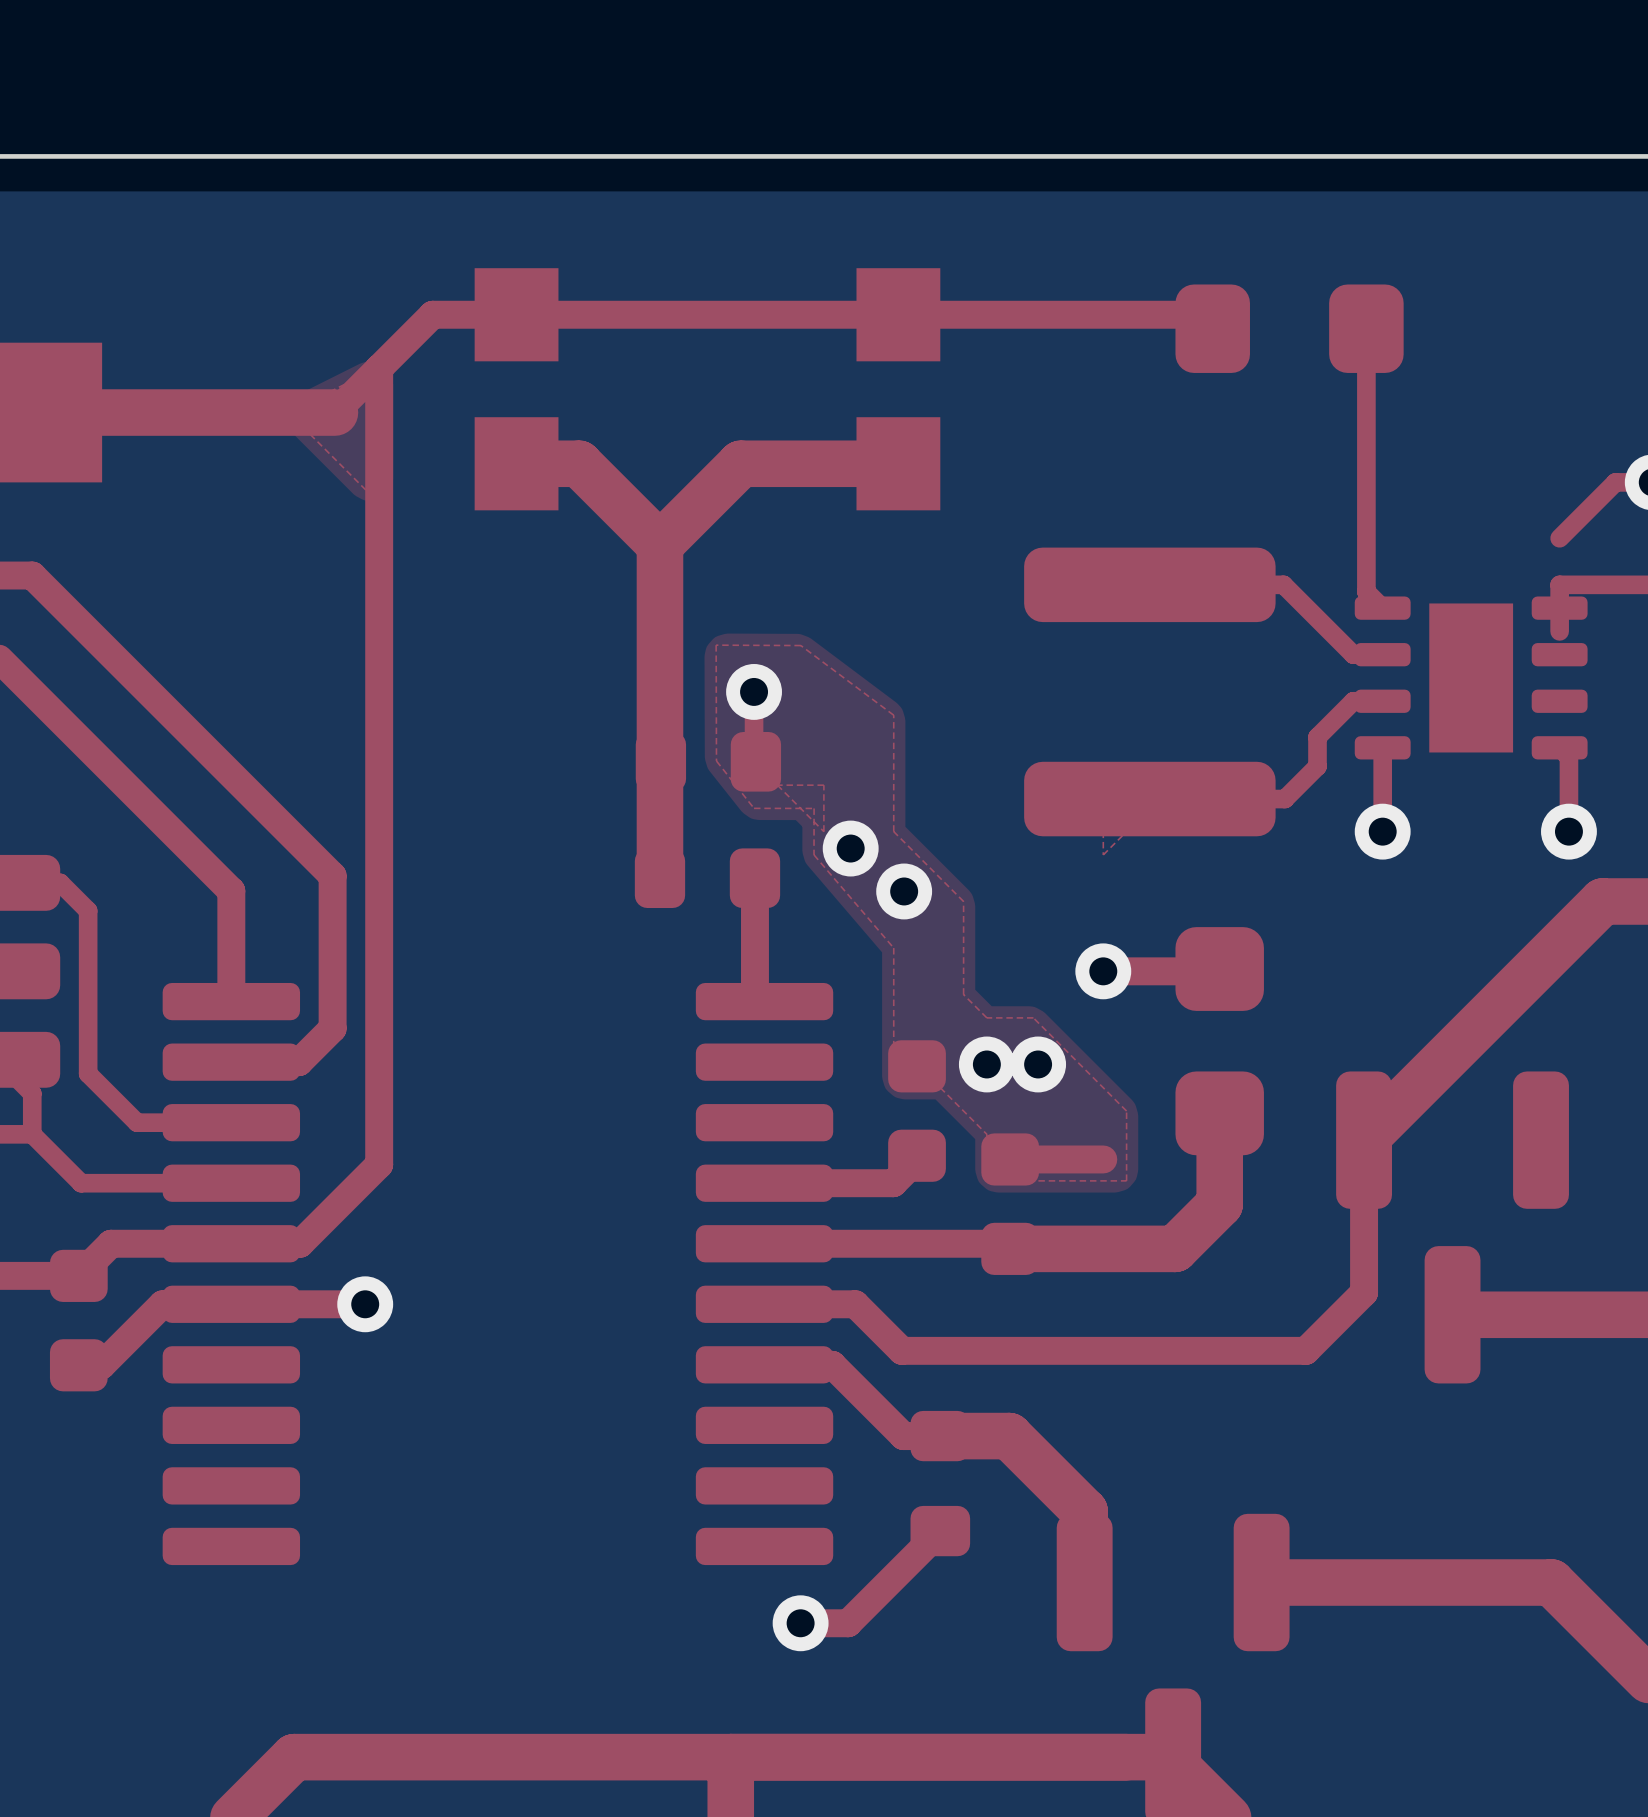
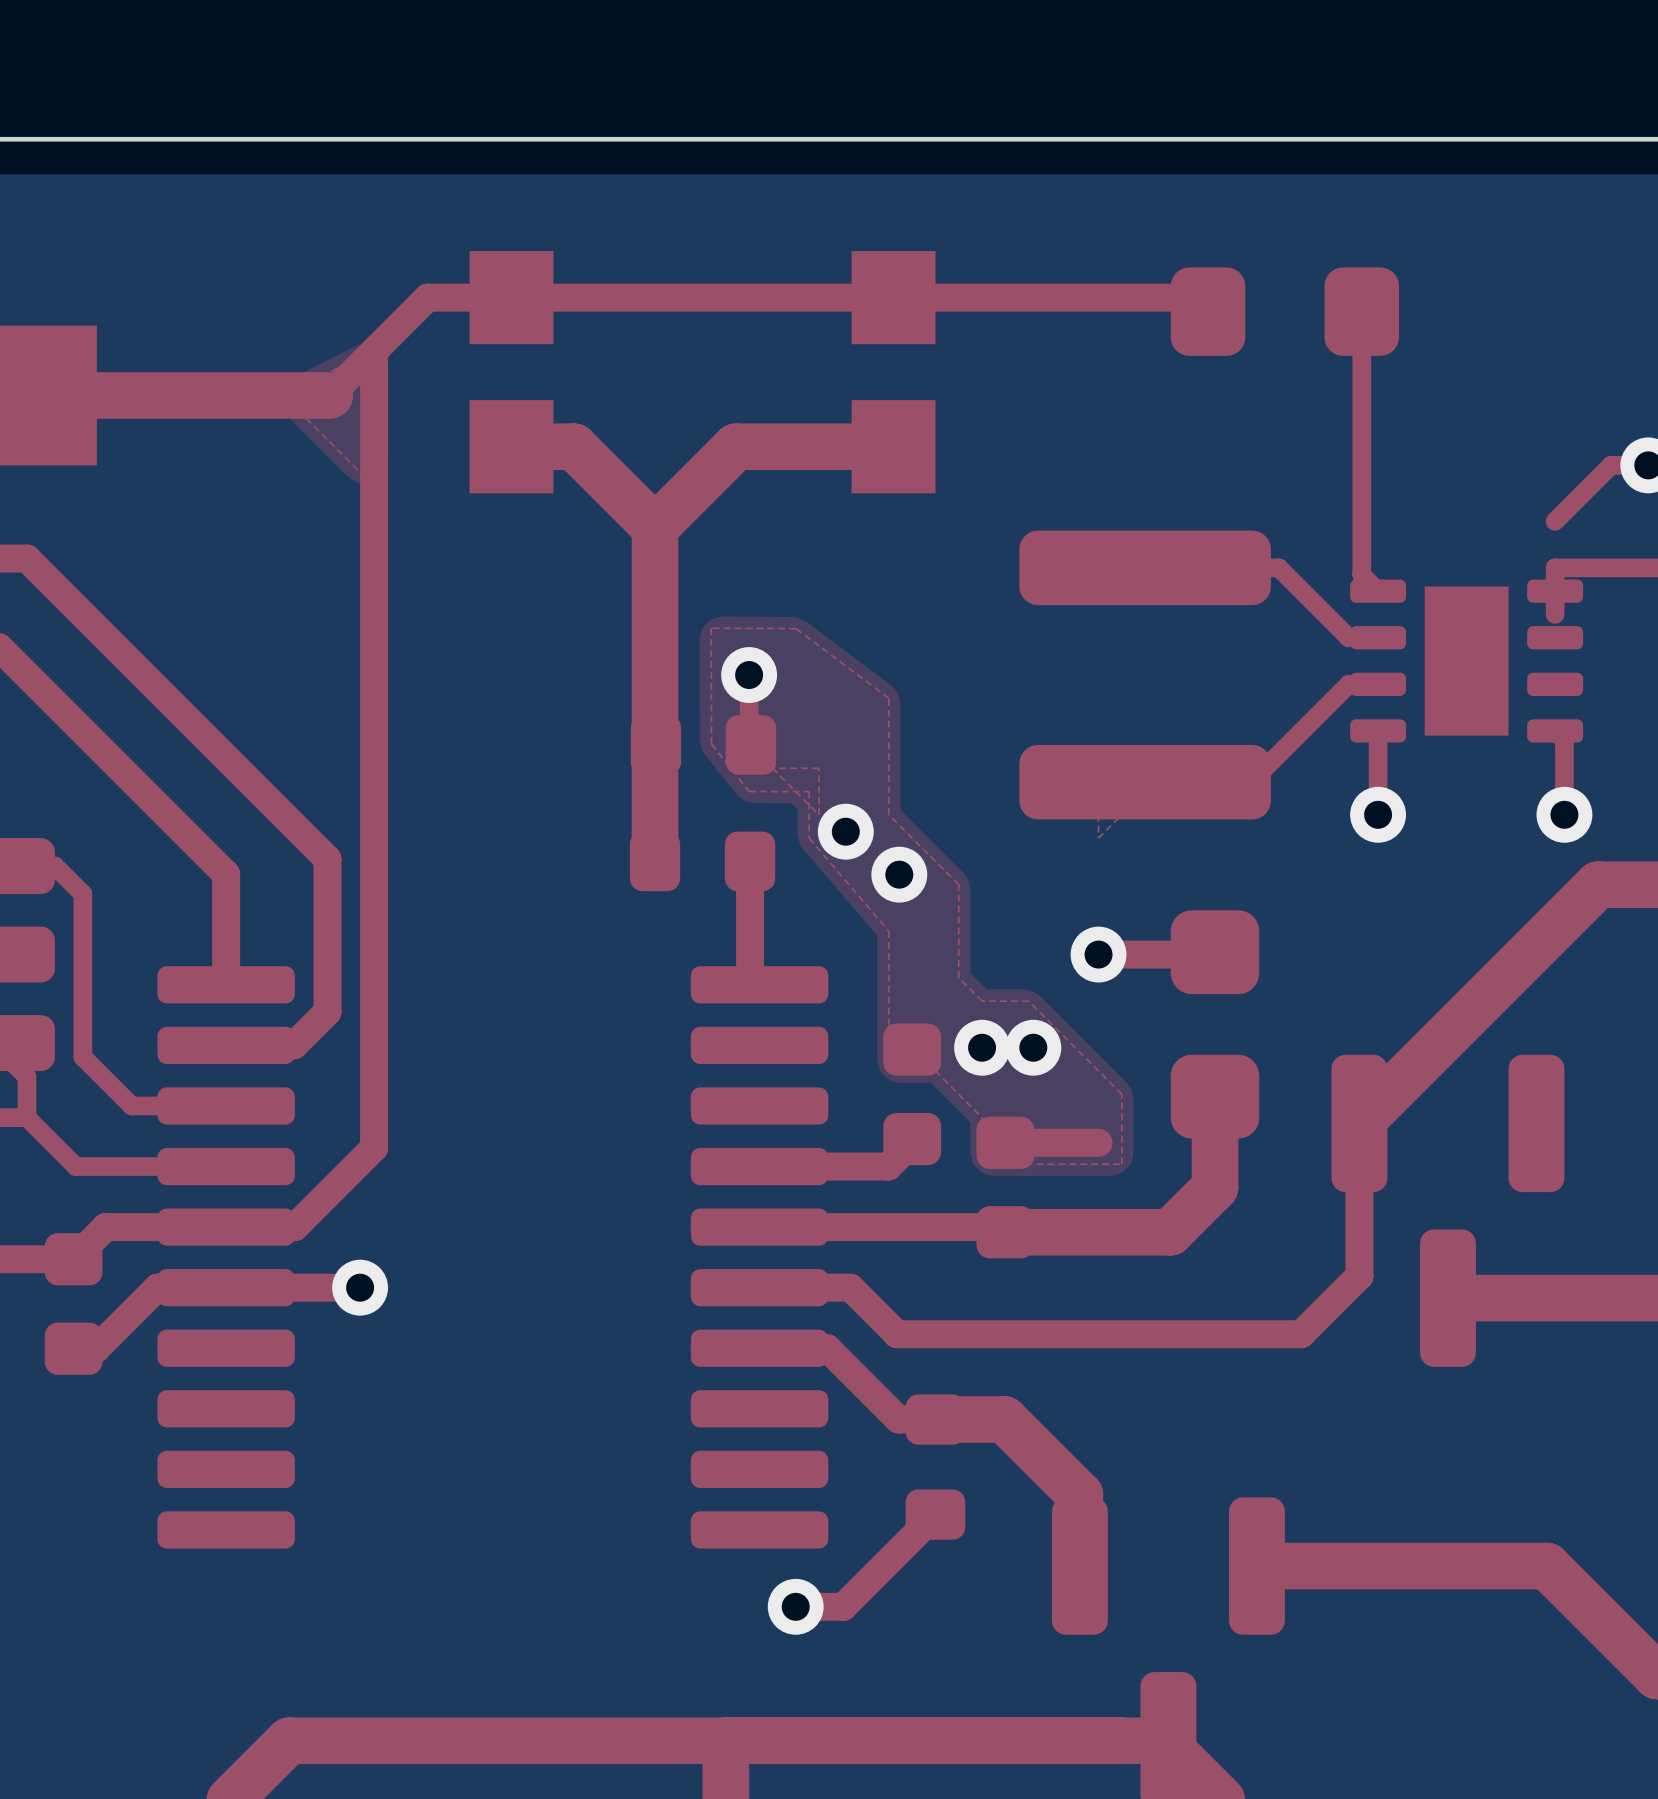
top track: (1317, 737) (1317, 766) (1284, 799) (1255, 799) -> (1312, 720) (1250, 782)

